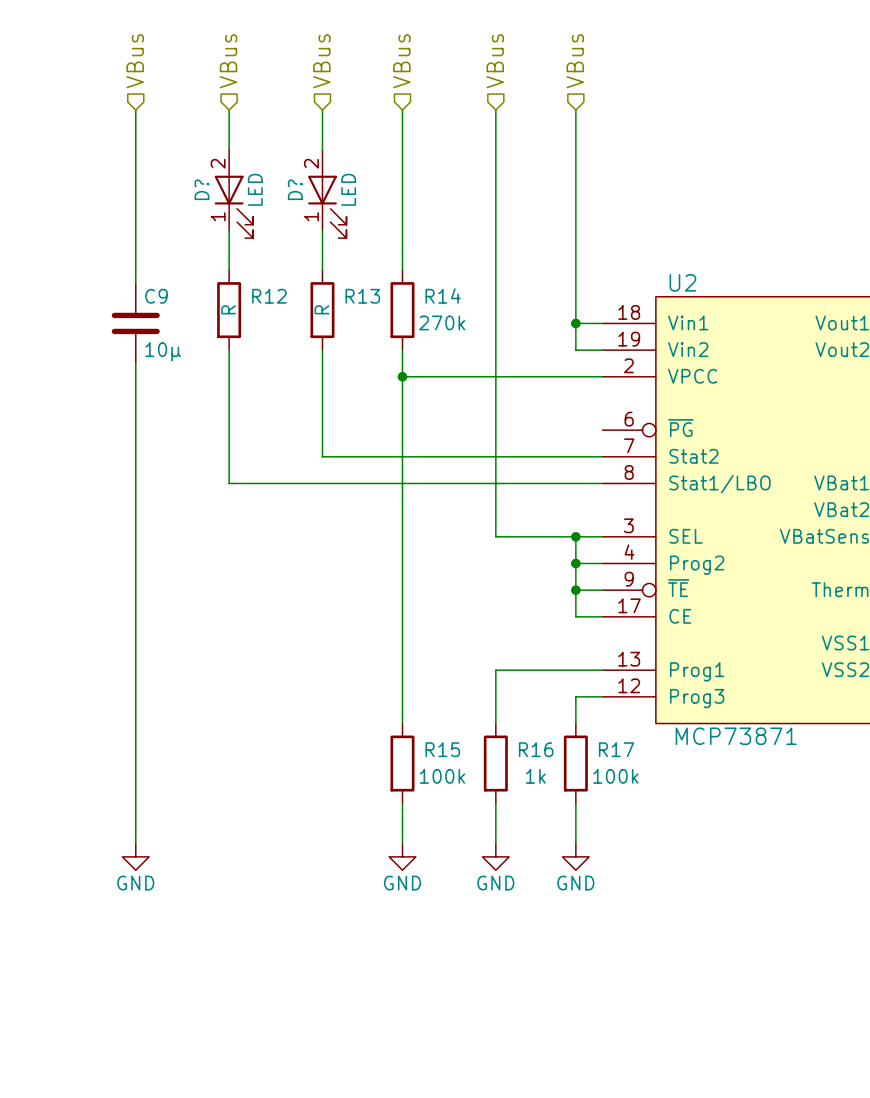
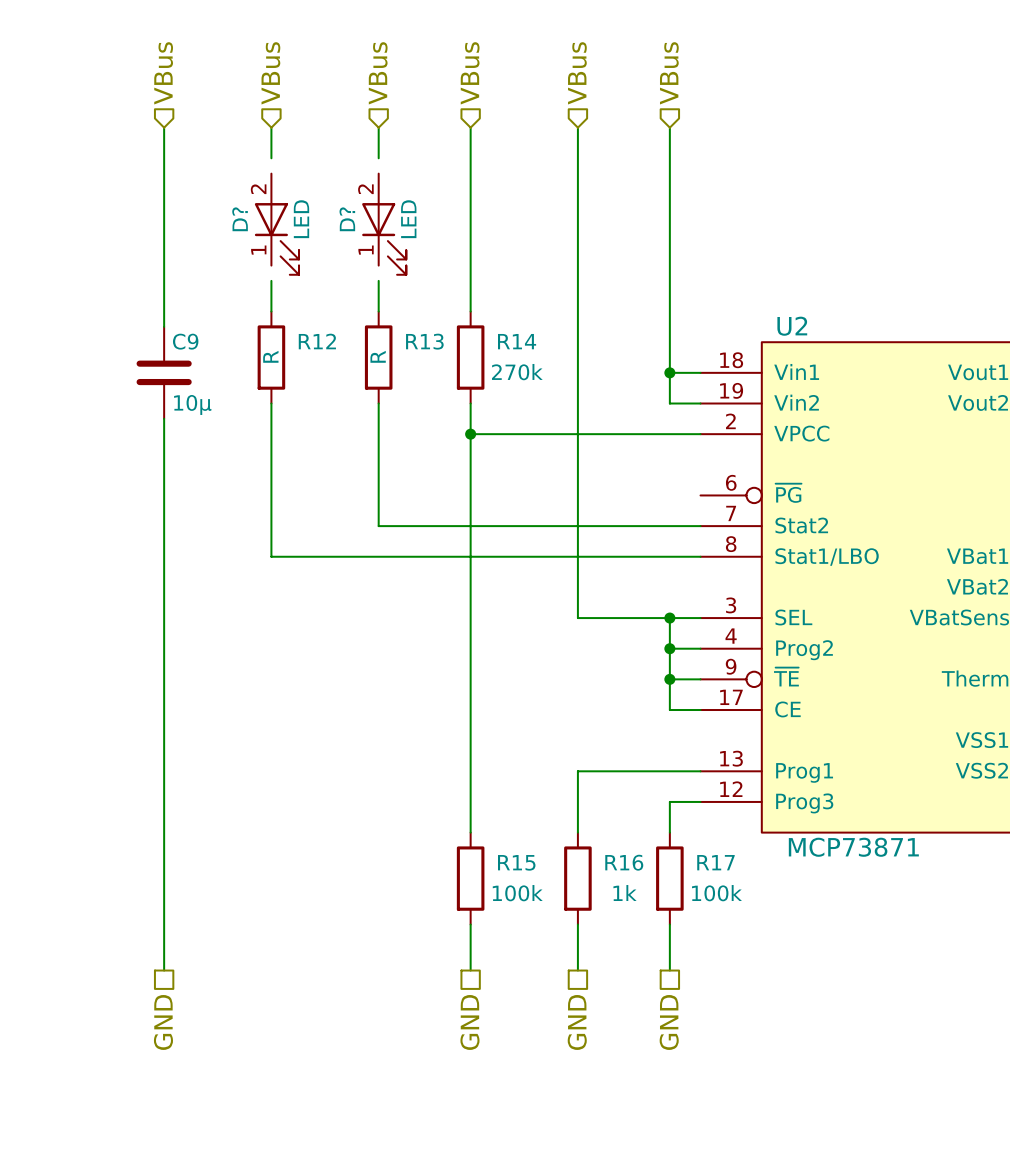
wire: (229, 136) (229, 150) -> none
wire: (322, 136) (322, 150) -> none
wire: (229, 230) (229, 243) -> none
wire: (322, 230) (322, 243) -> none
power symbol: GND (135, 856) -> none
power symbol: GND (402, 856) -> none
power symbol: GND (495, 856) -> none
power symbol: GND (575, 856) -> none
hierarchical label: none -> GND (163, 1022)
hierarchical label: none -> GND (469, 1022)
hierarchical label: none -> GND (577, 1022)
hierarchical label: none -> GND (669, 1022)

